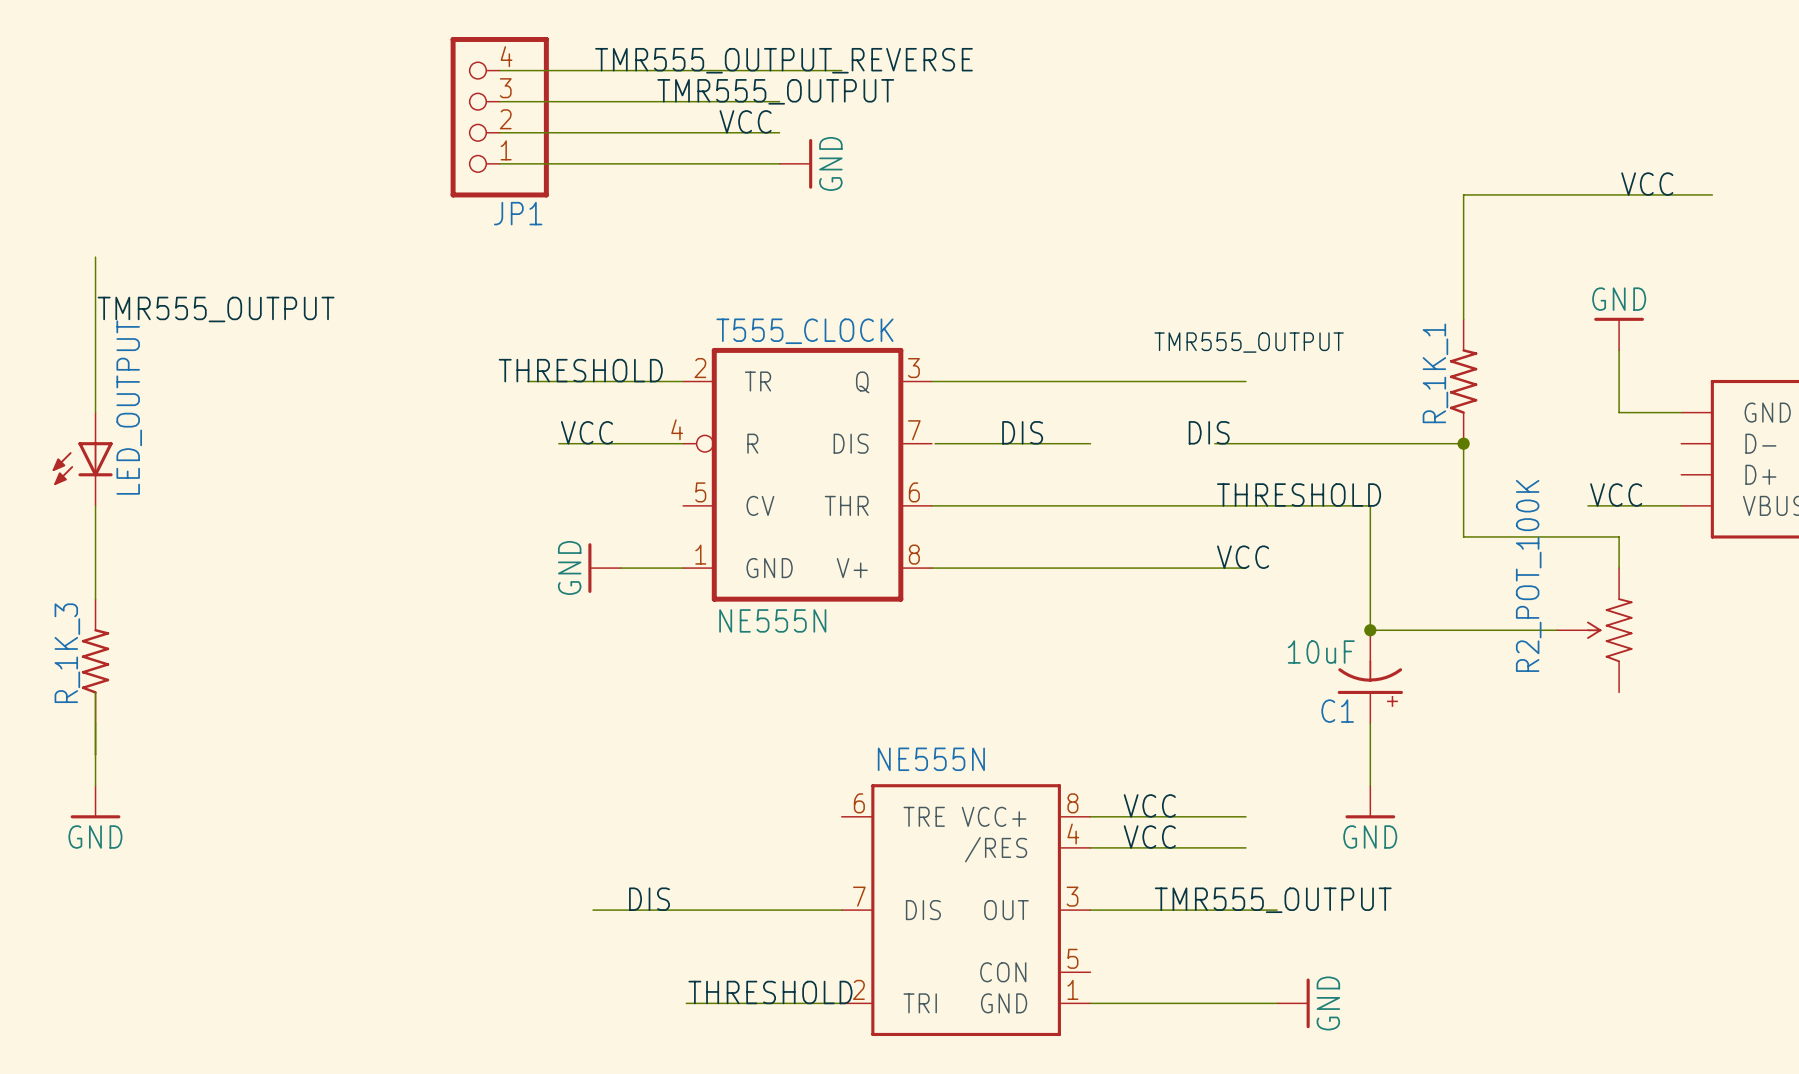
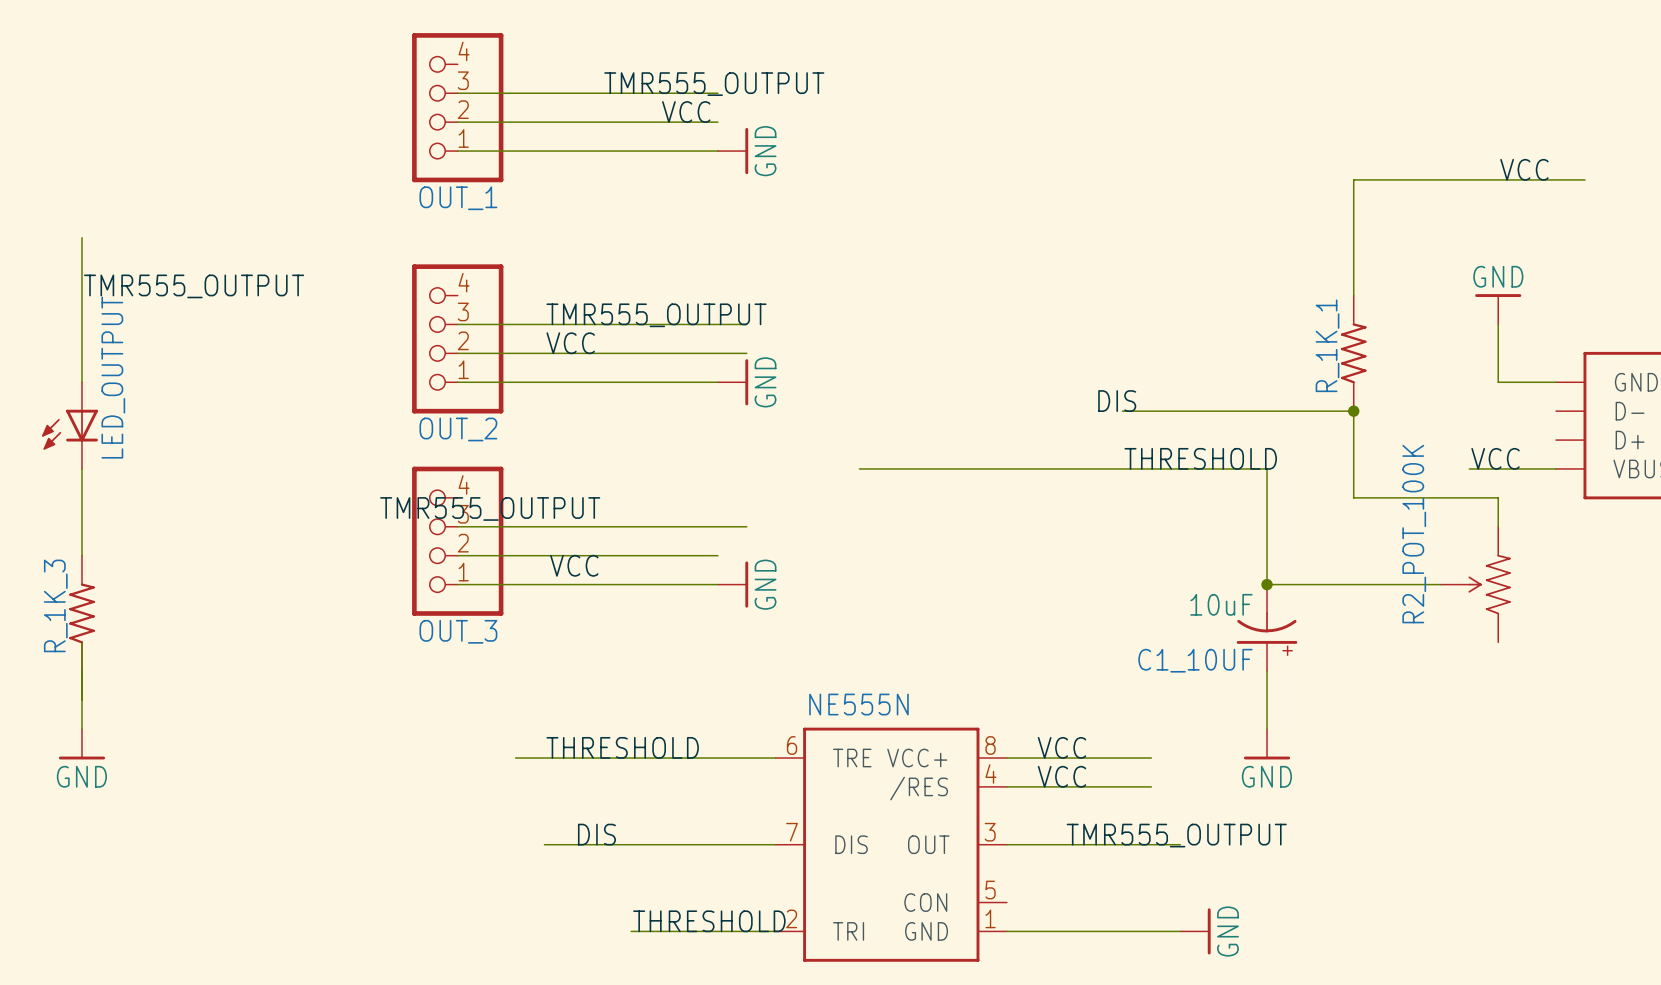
label: TMR555_OUTPUT_REVERSE (783, 60) -> none
wire: (499, 70) (841, 70) -> none
JP1 name: JP1 (518, 213) -> OUT_1 (458, 198)
label: none -> TMR555_OUTPUT (656, 315)
label: TMR555_OUTPUT (1249, 342) -> none
wire: none -> (457, 324) (746, 324)
OUT_2: none -> (457, 338)
label: THRESHOLD (580, 370) -> none
wire: none -> (457, 353) (483, 353)
wire: none -> (628, 353) (746, 353)
wire: (931, 381) (1245, 381) -> none
wire: none -> (457, 382) (717, 382)
power symbol: none -> GND (733, 382)
label position: VCC (587, 432) -> VCC (570, 343)
label: DIS (1022, 432) -> none
wire: (558, 443) (683, 443) -> none
wire: (935, 443) (1090, 443) -> none
T555_CLOCK: NE555N (807, 474) -> none
label: none -> TMR555_OUTPUT (490, 508)
label: VCC (1243, 557) -> none
wire: none -> (457, 526) (570, 526)
power symbol: GND (604, 568) -> none
wire: none -> (628, 526) (746, 526)
wire: (931, 568) (1245, 568) -> none
OUT_3: none -> (457, 541)
wire: none -> (457, 555) (717, 555)
label: none -> VCC (574, 565)
wire: none -> (457, 584) (717, 584)
power symbol: none -> GND (733, 584)
C1 name: C1 (1337, 711) -> C1_10UF (1195, 660)
label: none -> THRESHOLD (622, 747)
wire: none -> (515, 758) (775, 758)

